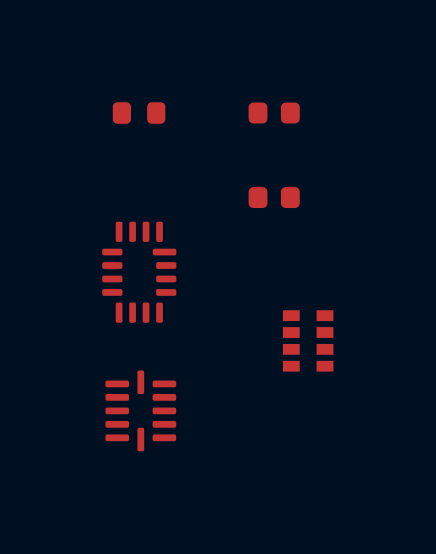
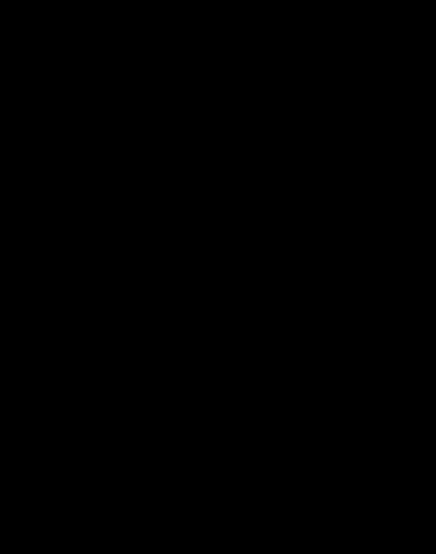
part: (139, 113) -> none
part: (274, 113) -> none
part: (274, 197) -> none
part: (139, 272) -> none
part: (308, 340) -> none
part: (140, 410) -> none

